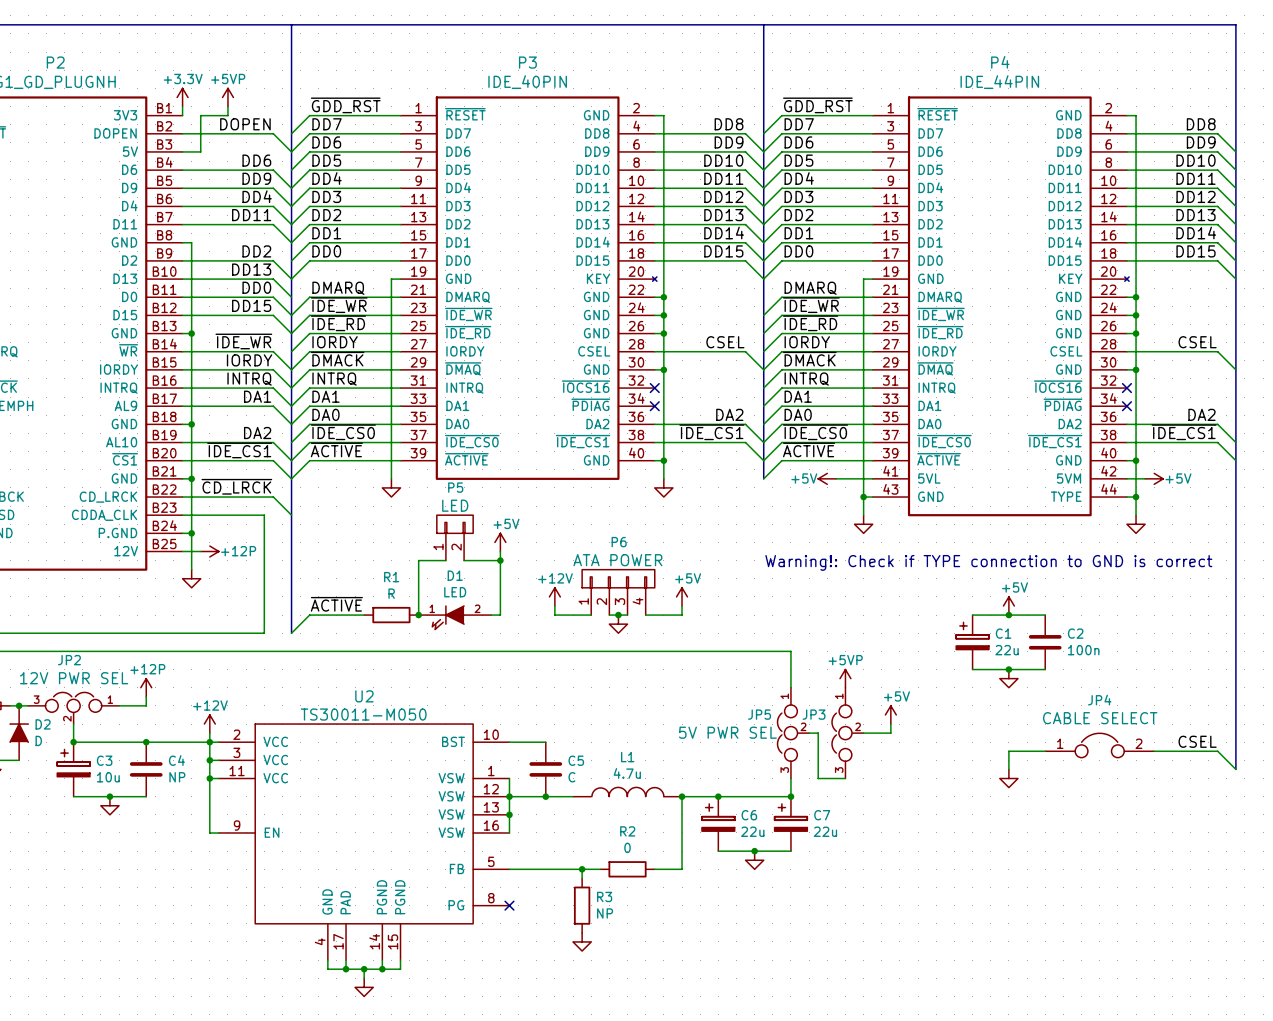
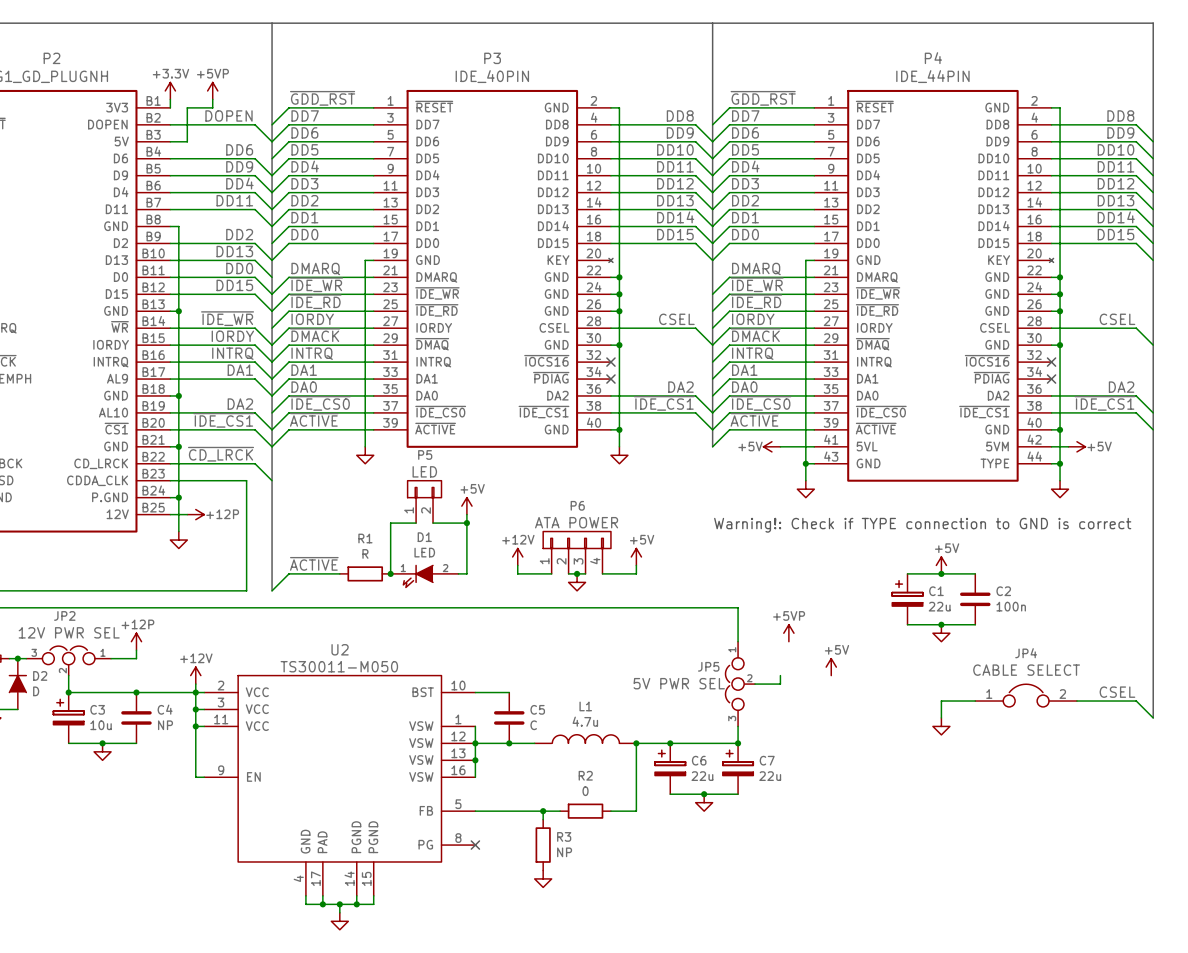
wire: (890, 724) (890, 733) (863, 733) -> none
wire: (818, 733) (818, 778) (845, 778) -> (763, 684) (780, 684) (780, 675)
JP3: (847, 733) -> none

